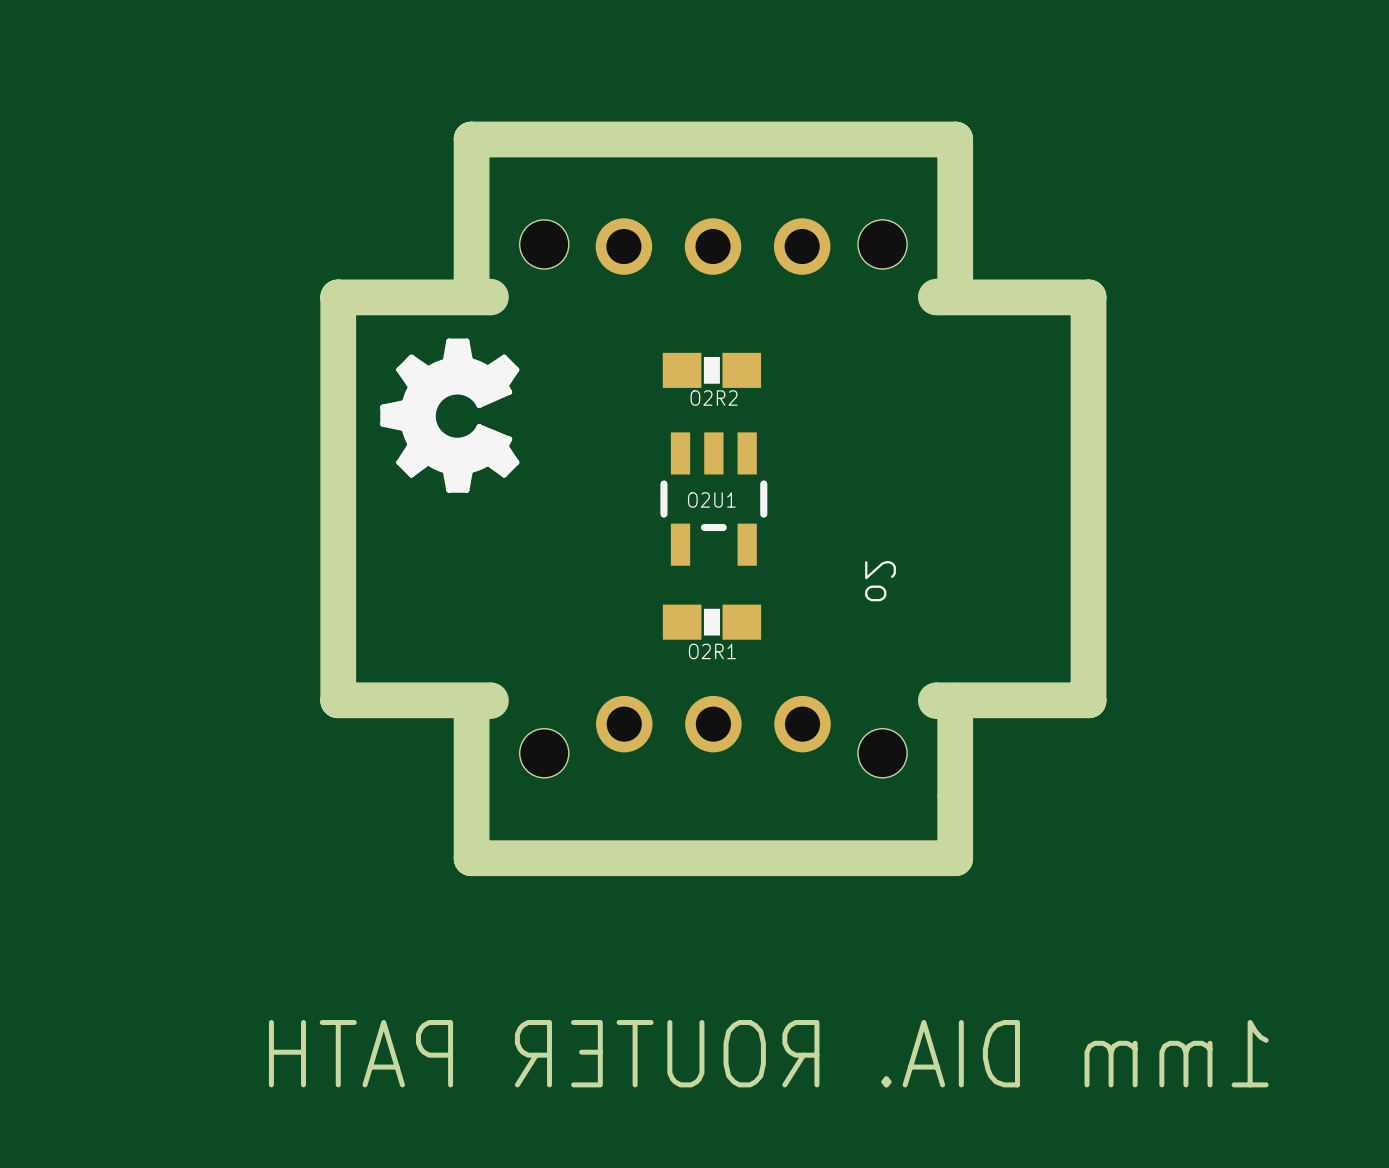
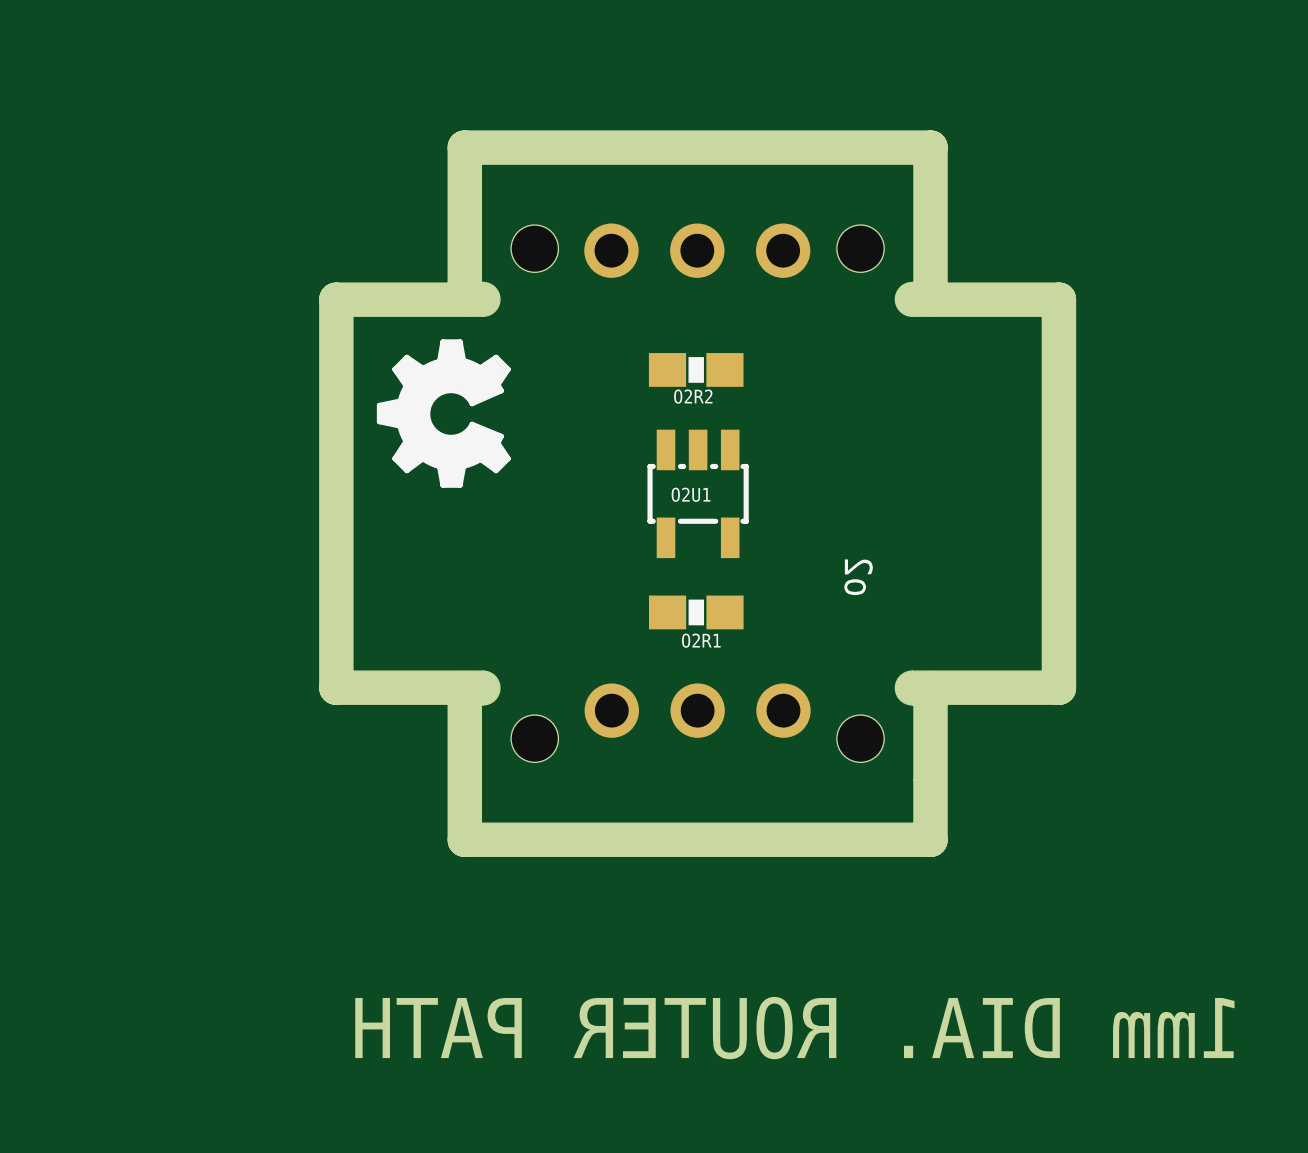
O2U1 footprint: [660, 432, 768, 566] -> [647, 429, 749, 559]

